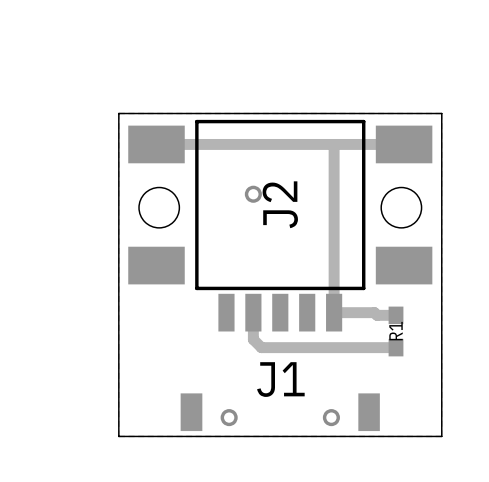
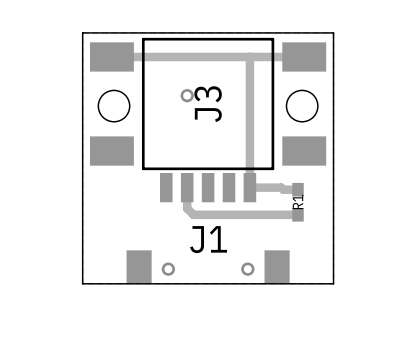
J2 name: J2 (280, 204) -> J3 (208, 104)
J1 footprint: [180, 293, 380, 432] -> [126, 172, 290, 284]

